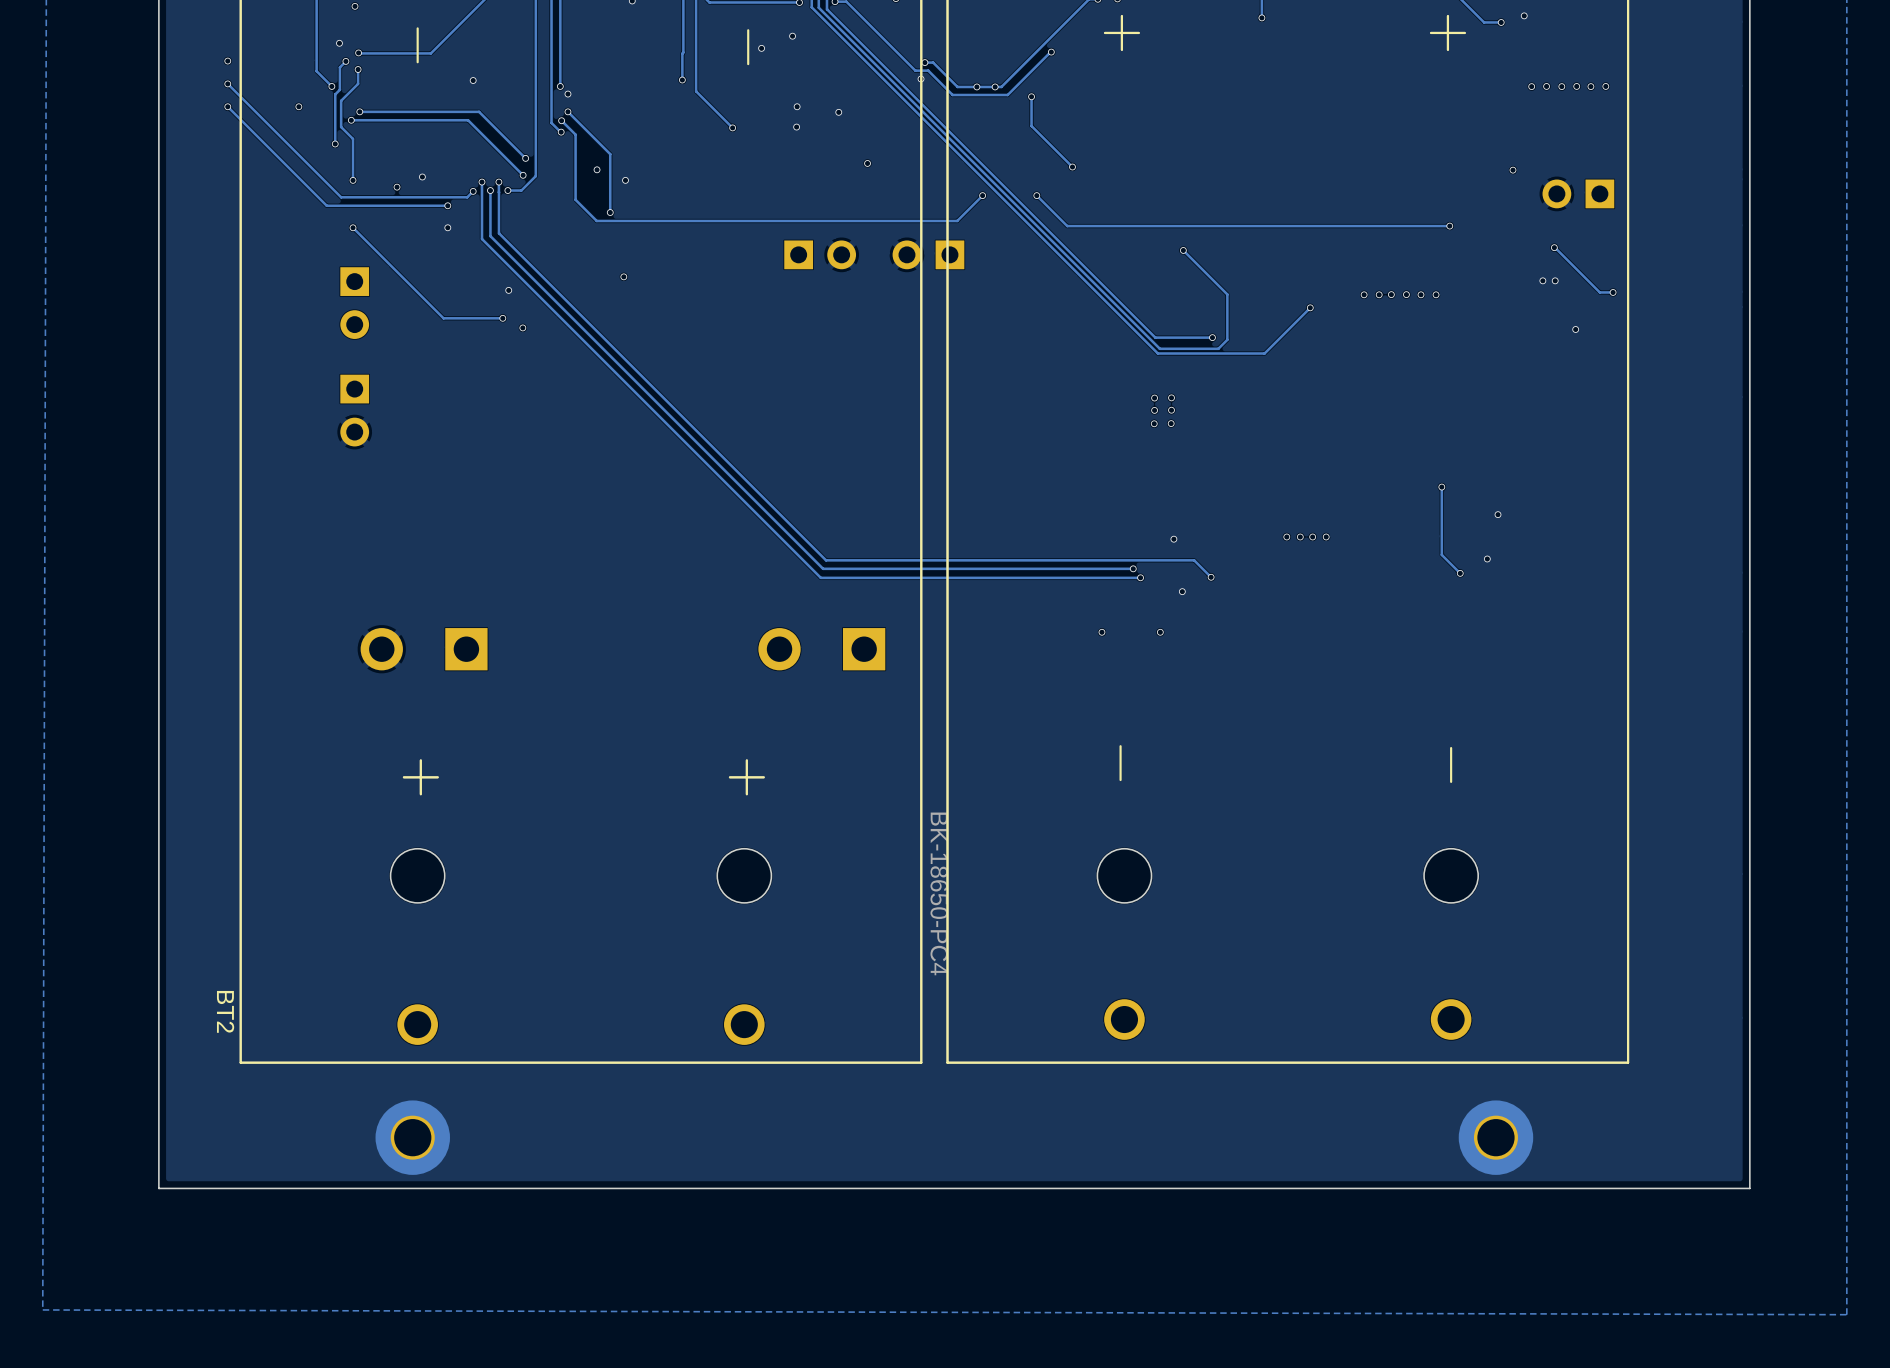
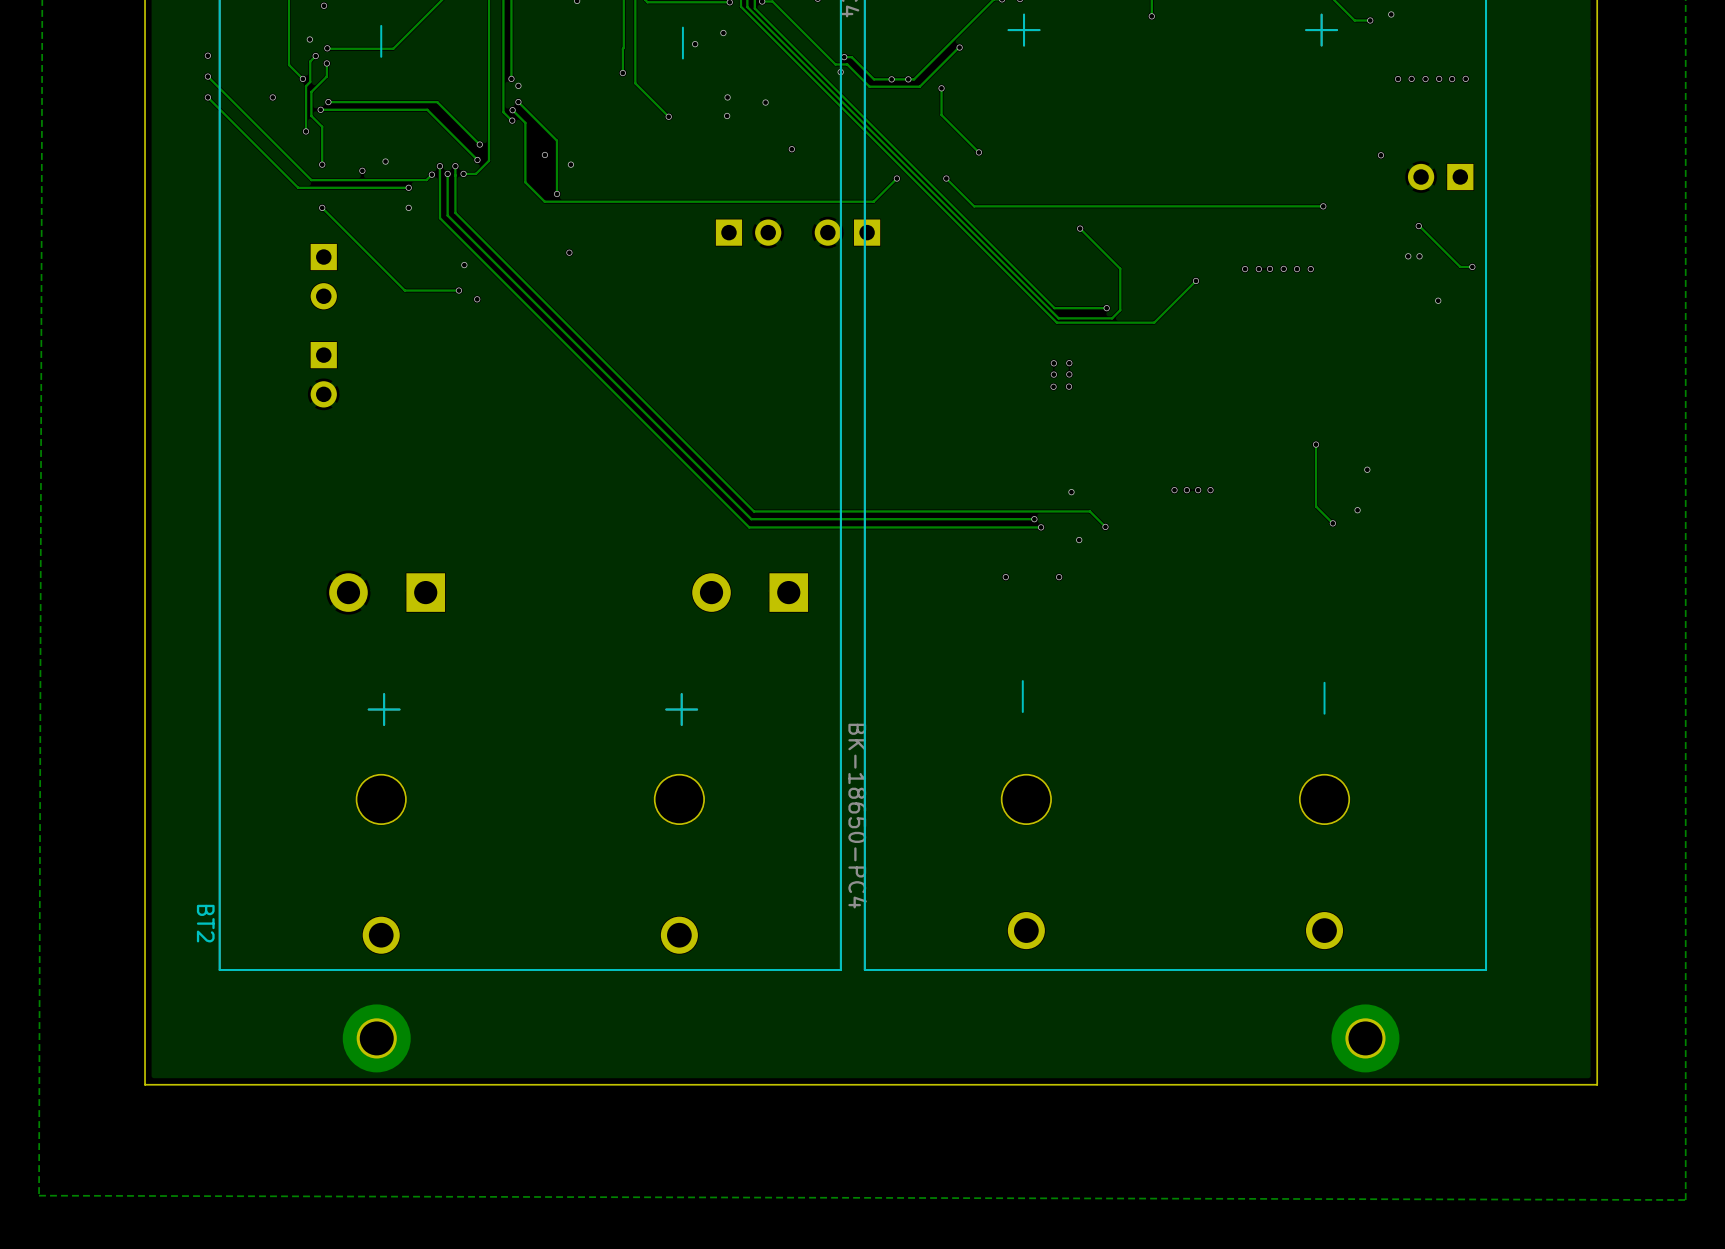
via: (473, 80) -> none

